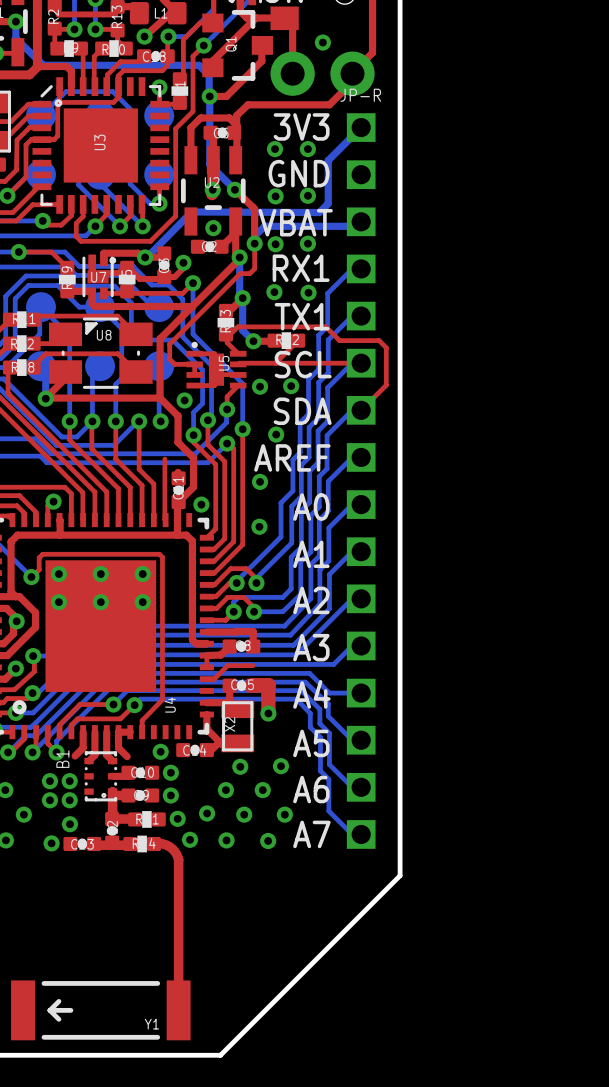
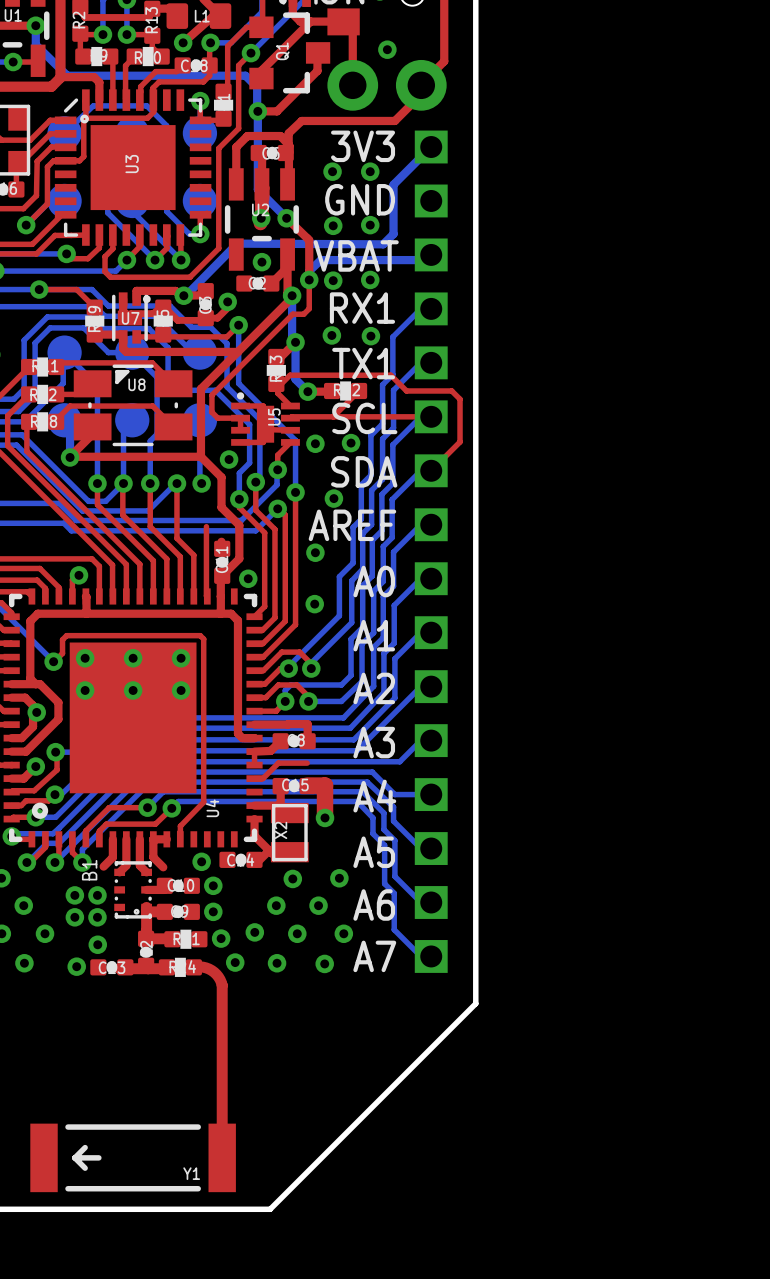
JP-R name: JP-R (360, 95) -> none

